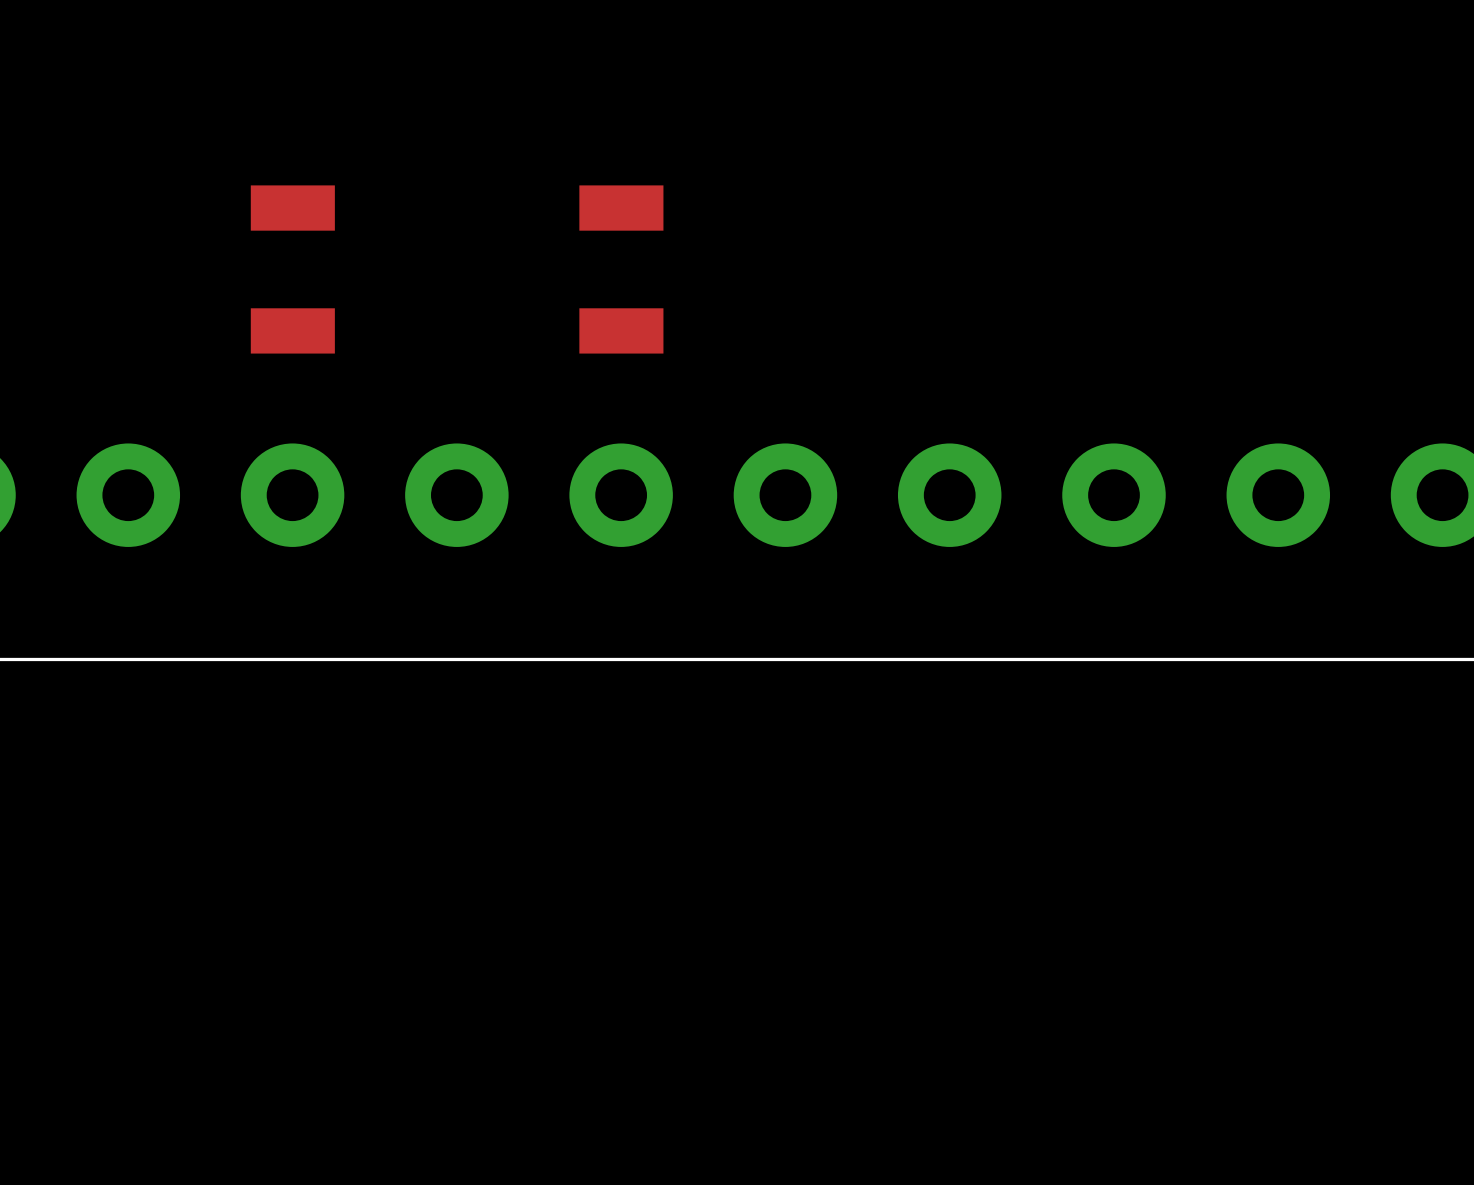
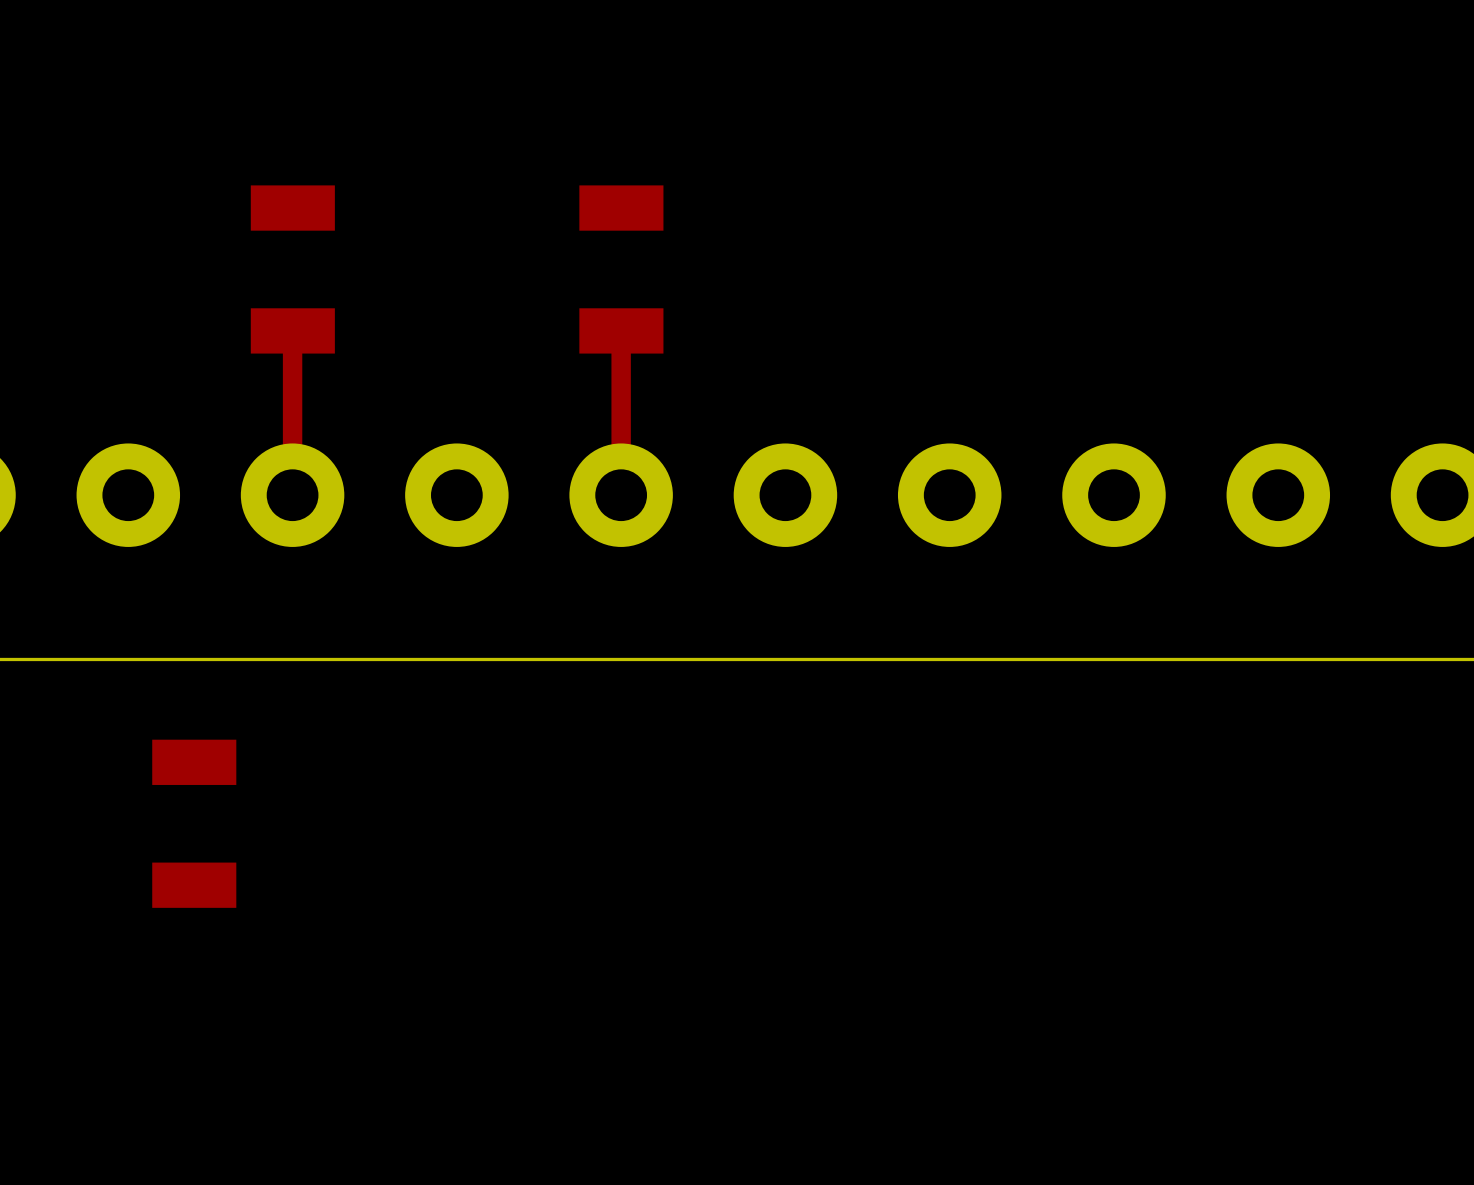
top track: none -> (292, 331) (292, 495)
top track: none -> (621, 331) (621, 495)
part: none -> (194, 823)

